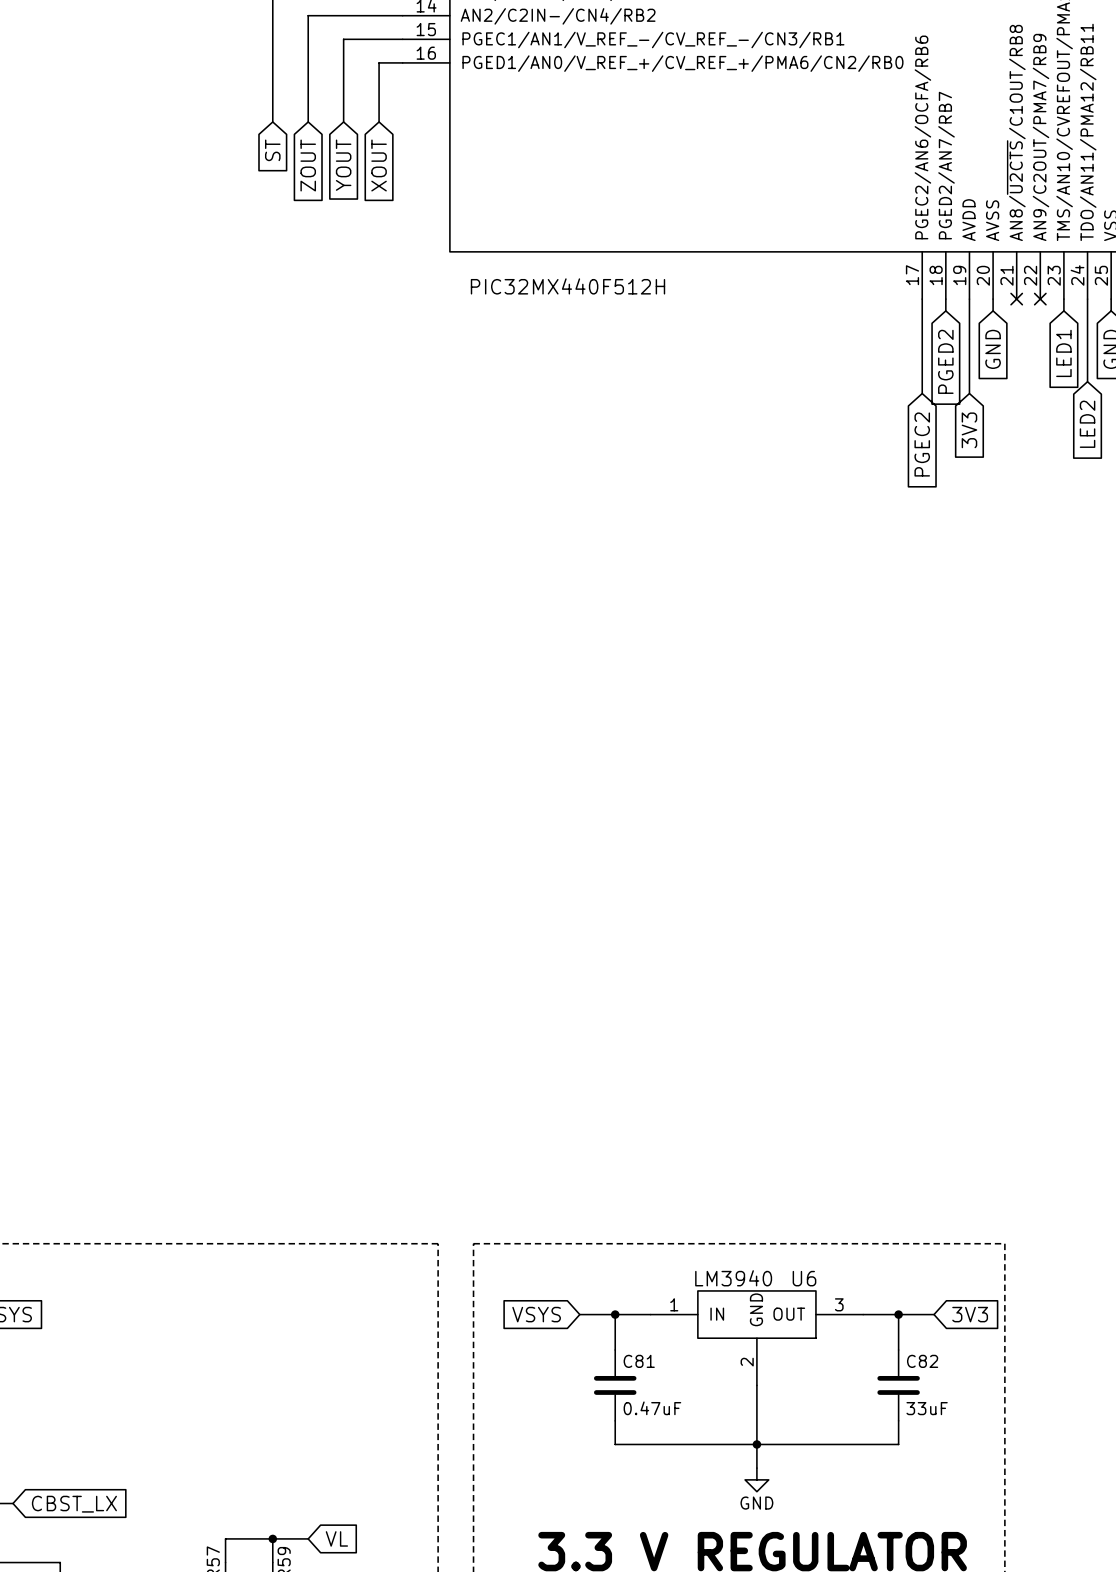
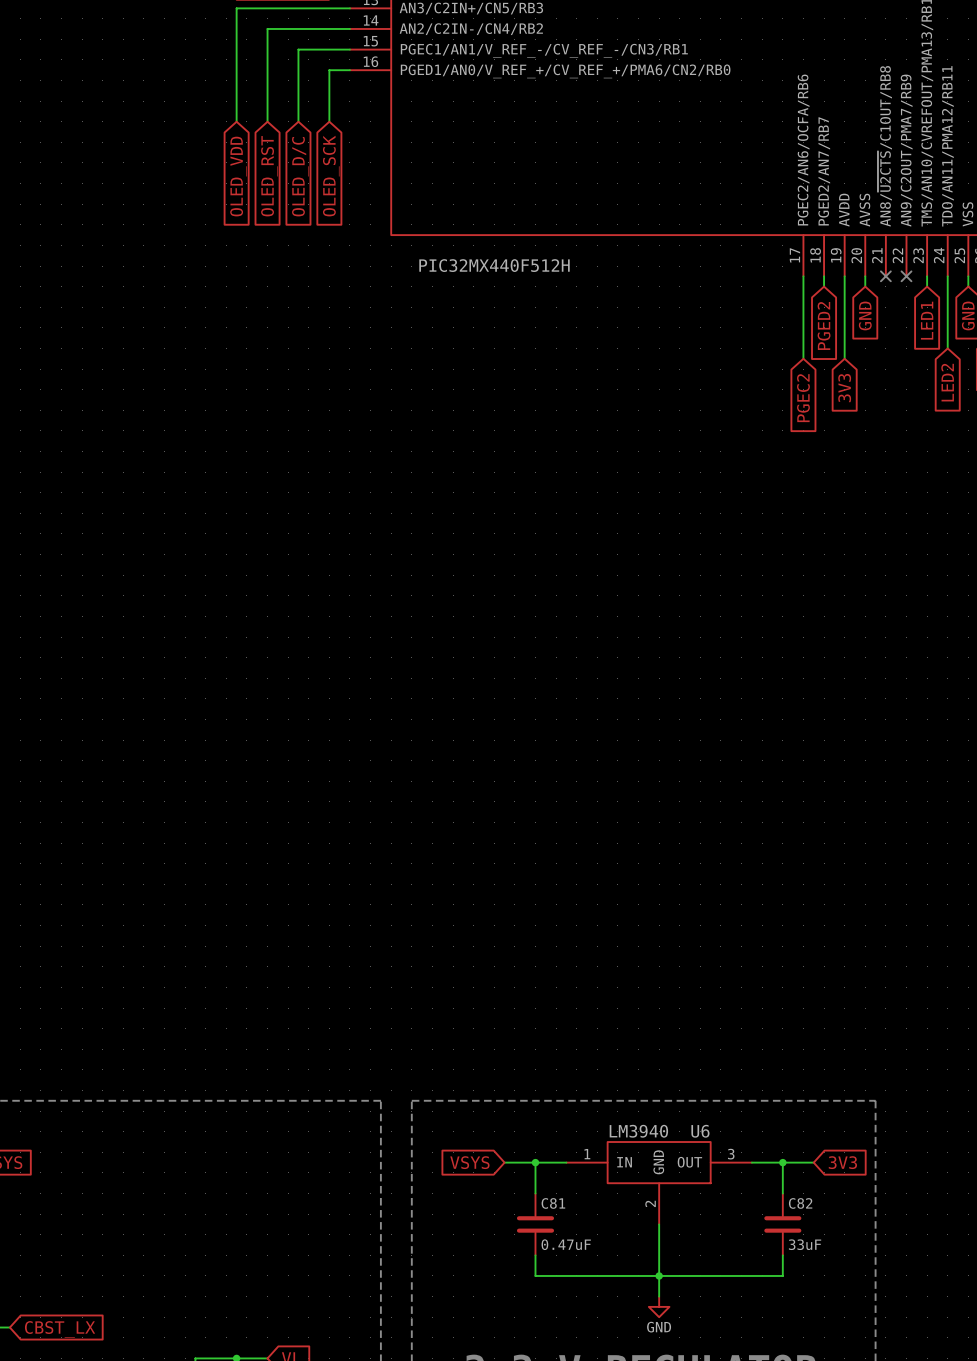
global label: ST (272, 150) -> OLED_VDD (238, 176)
global label: ZOUT (308, 165) -> OLED_RST (269, 176)
global label: YOUT (343, 165) -> OLED_D/C (300, 176)
global label: XOUT (379, 165) -> OLED_SCK (331, 176)

